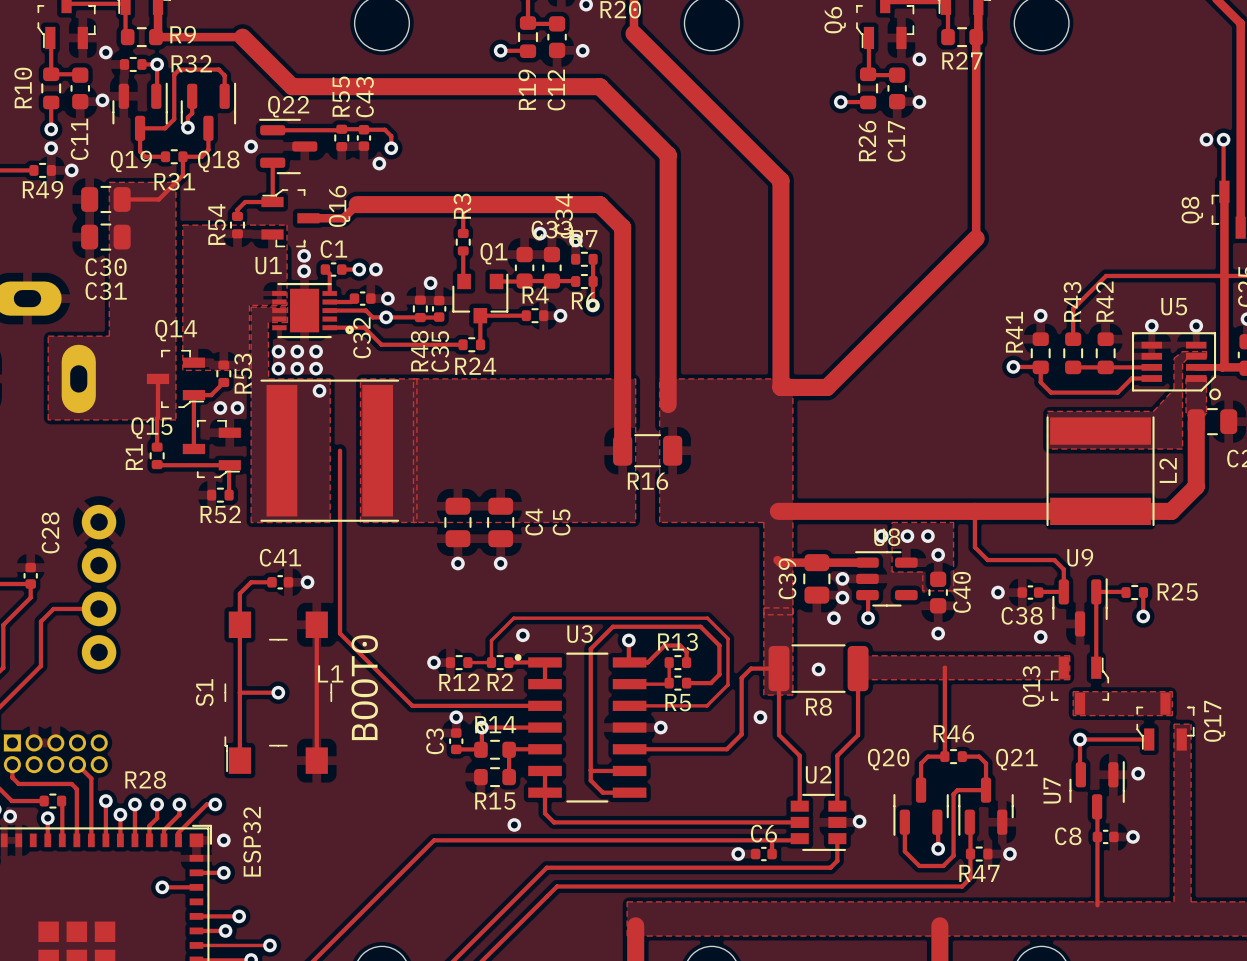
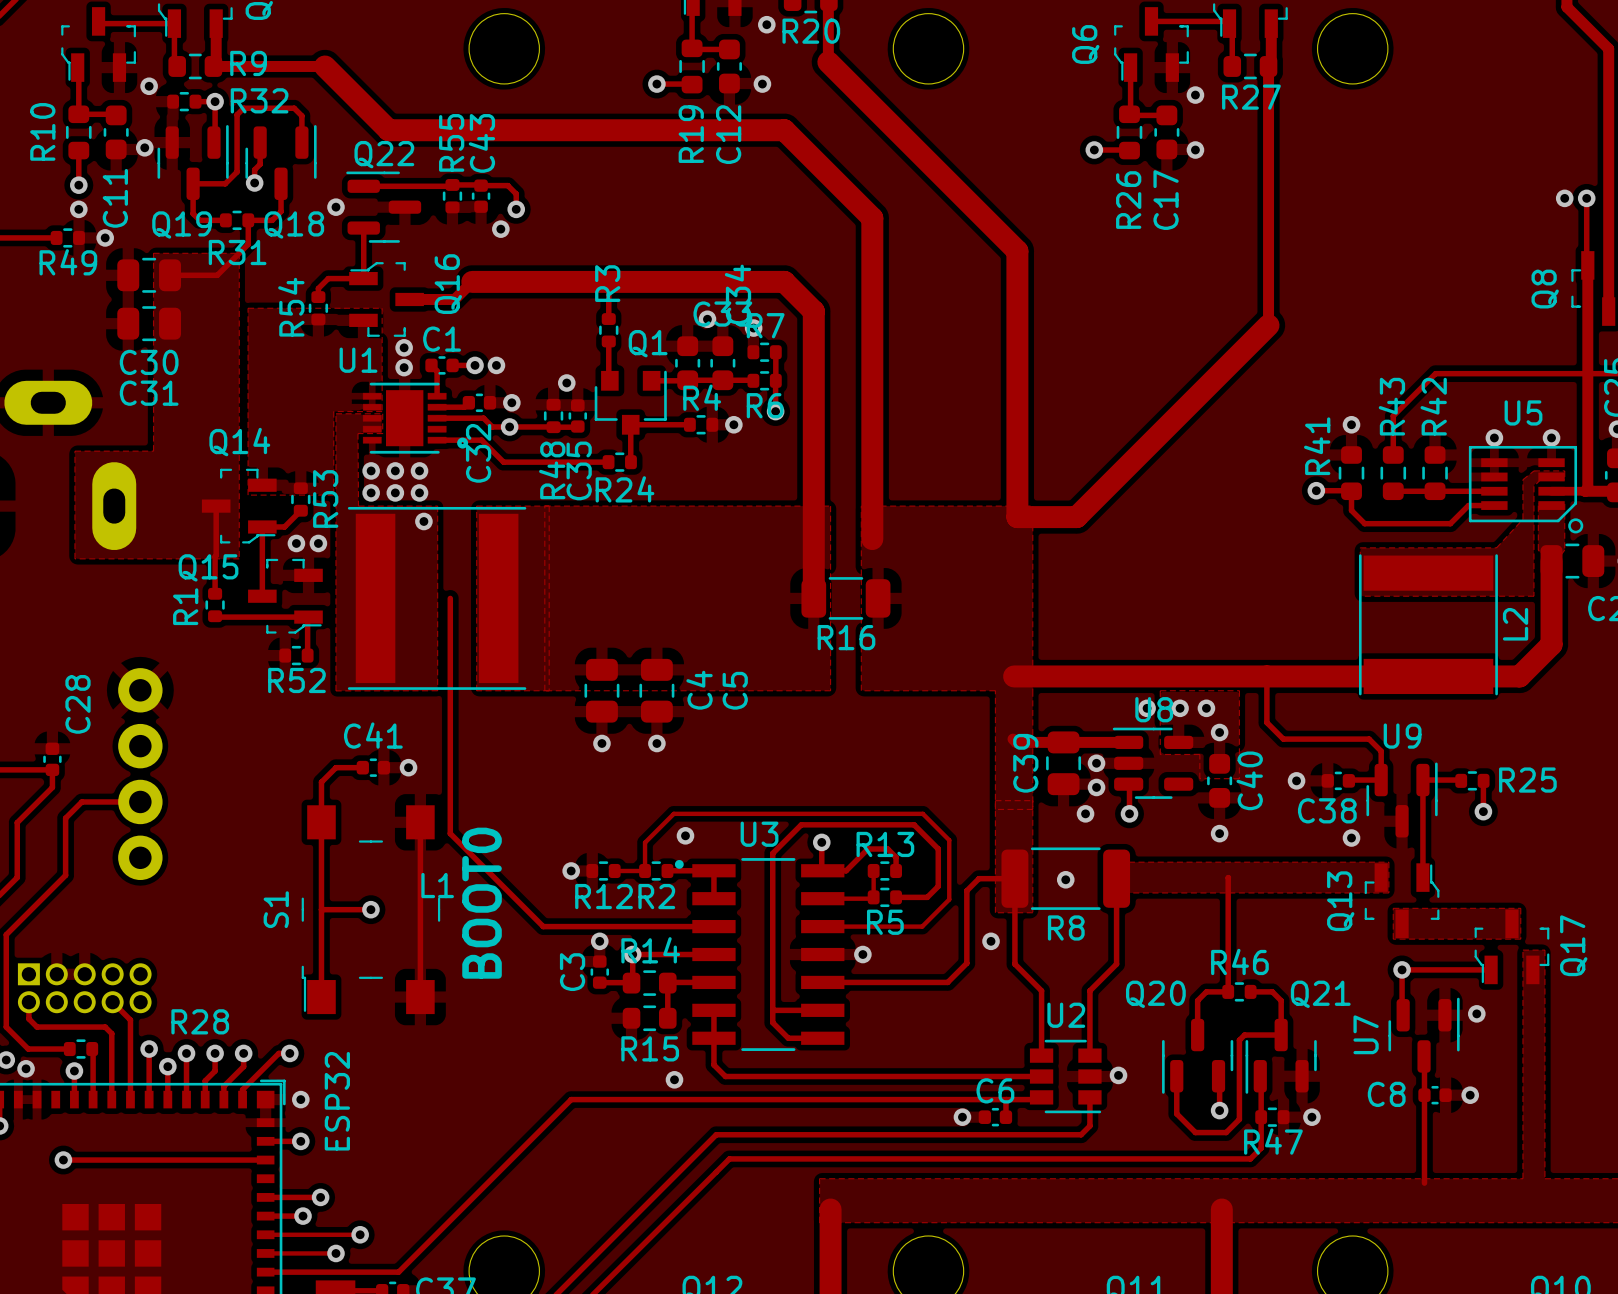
track: none -> (63, 1160) (221, 1160)
via: none -> (63, 1160)
via: (162, 887) -> none

